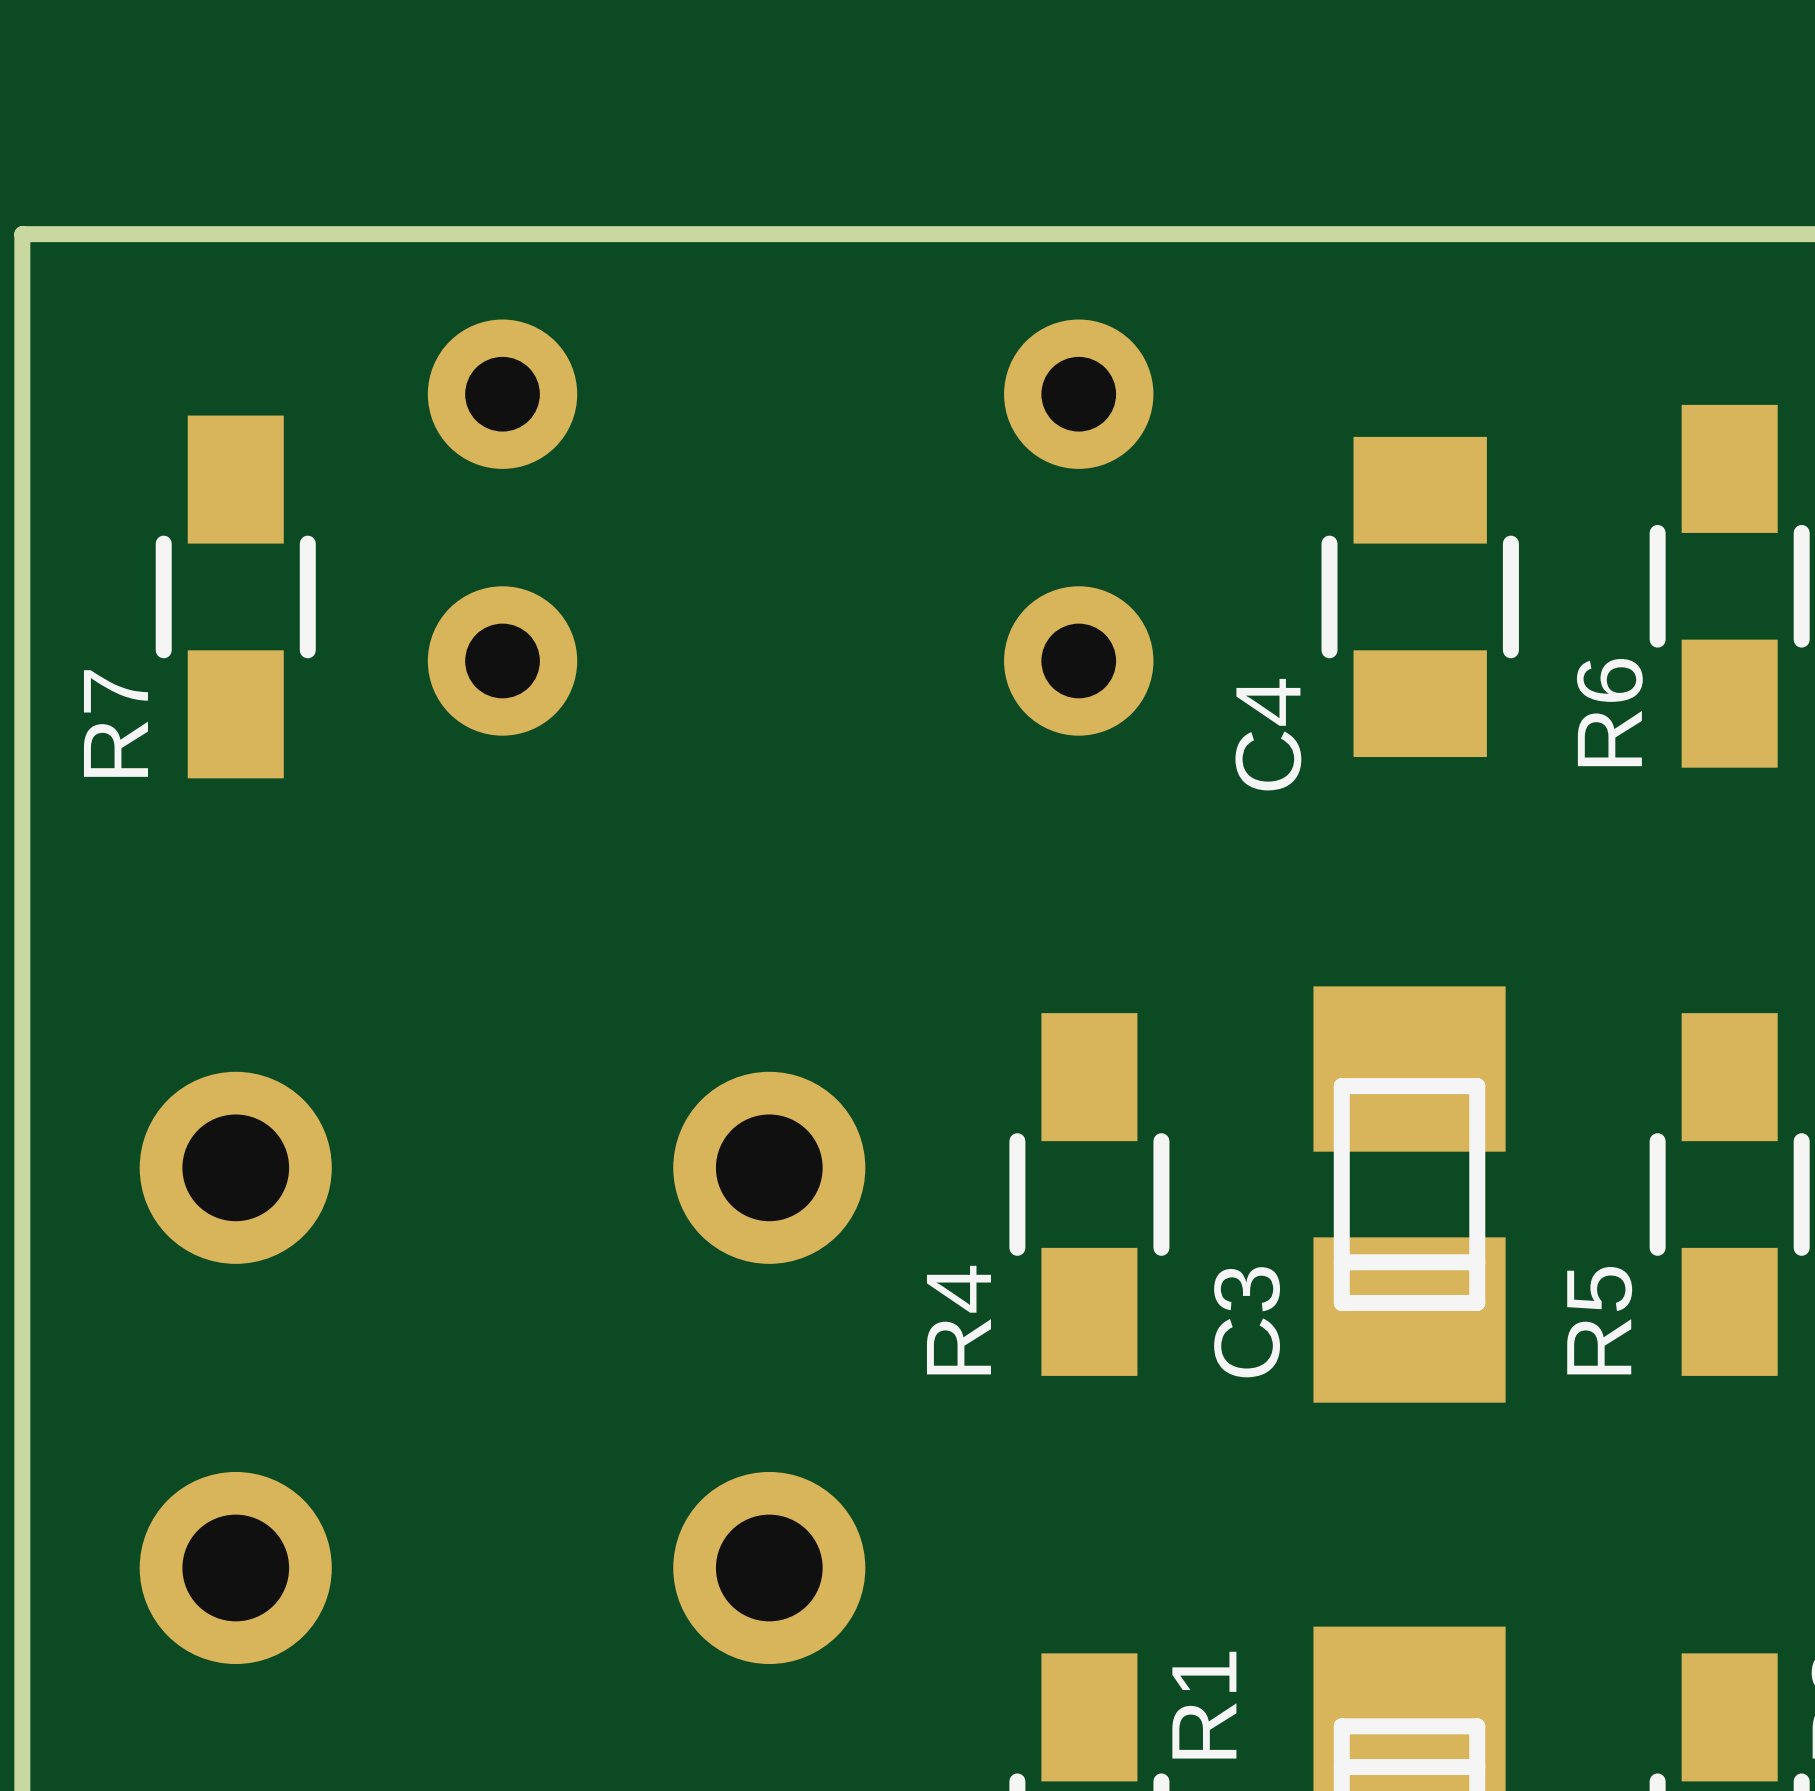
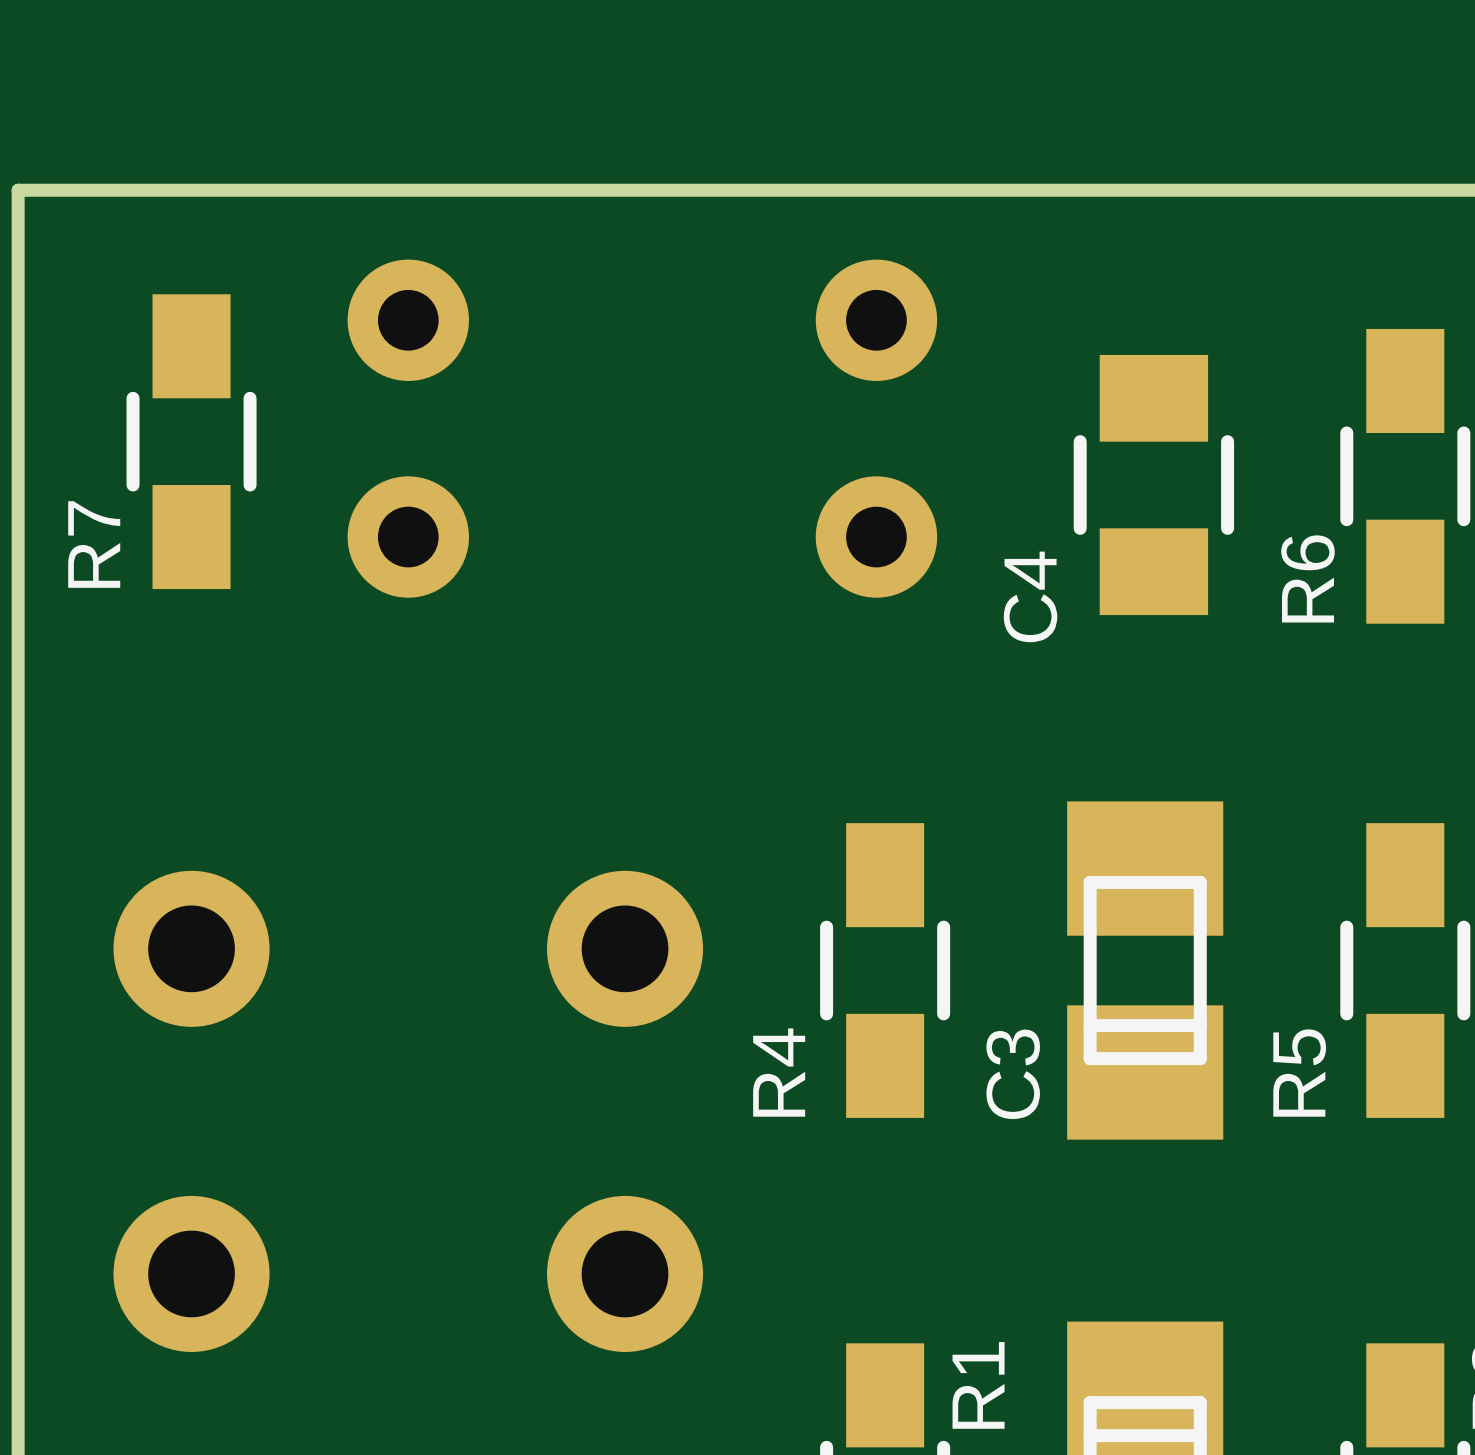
R7 position: (235, 596) -> (191, 441)

